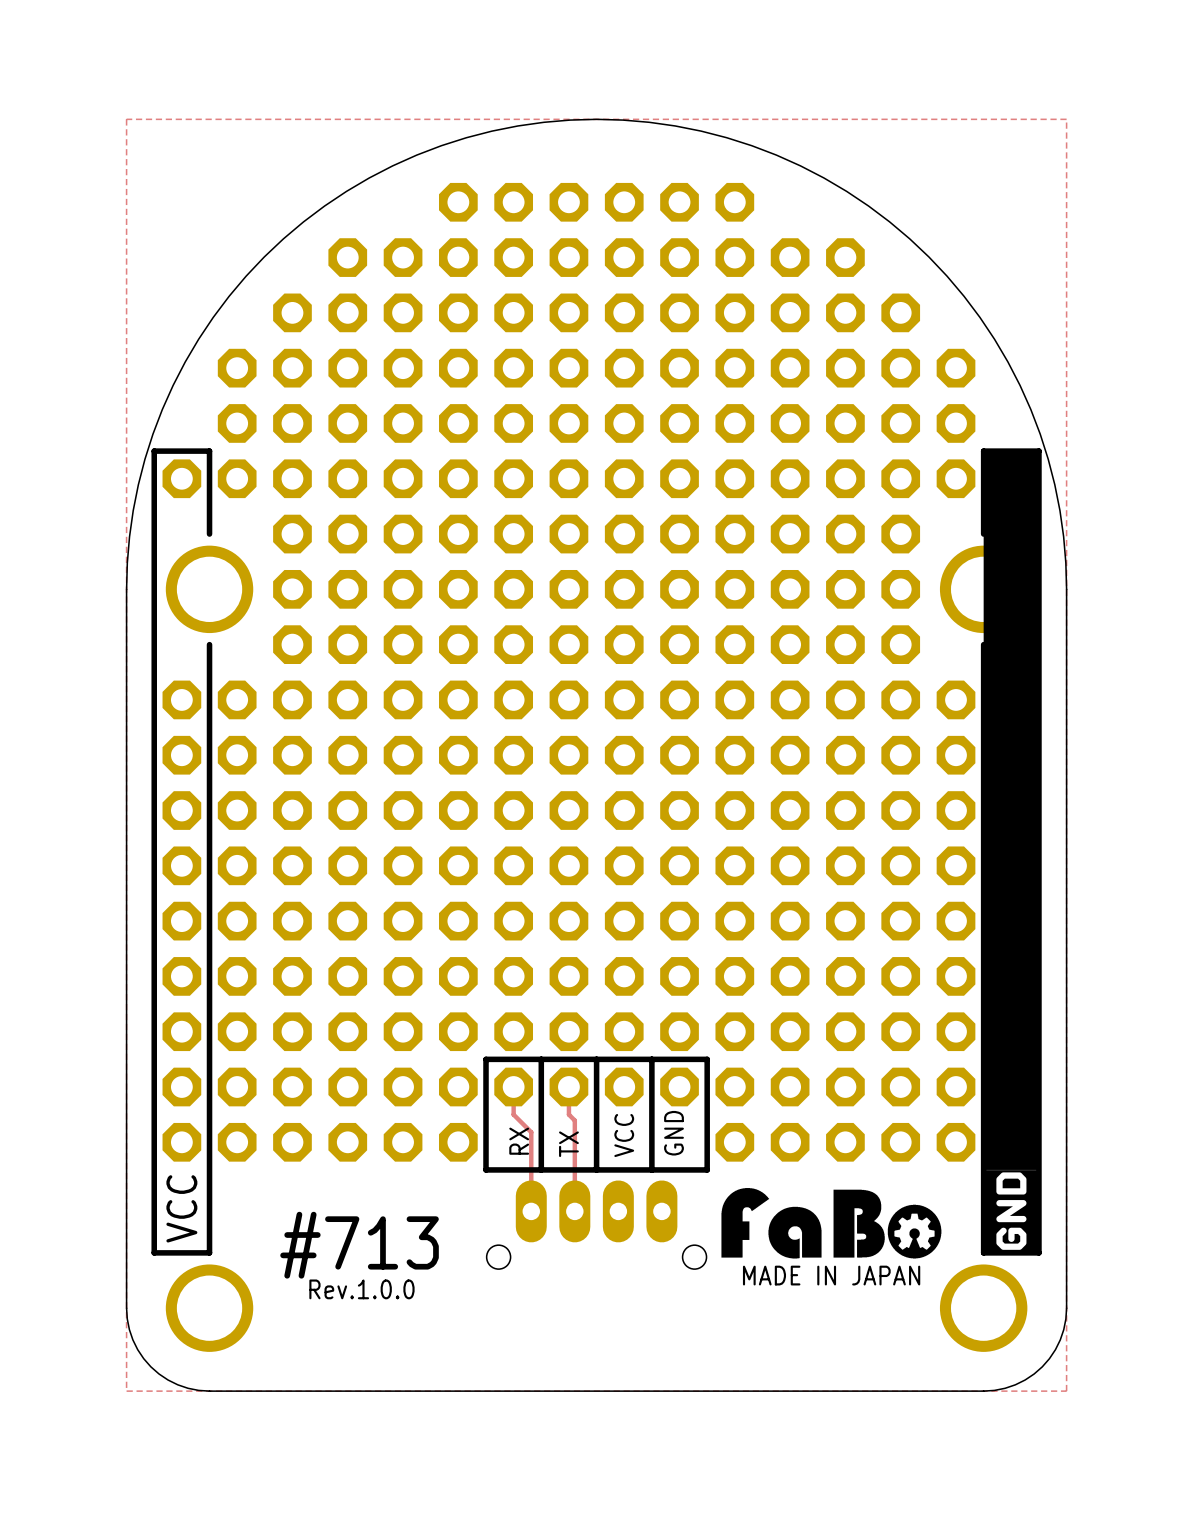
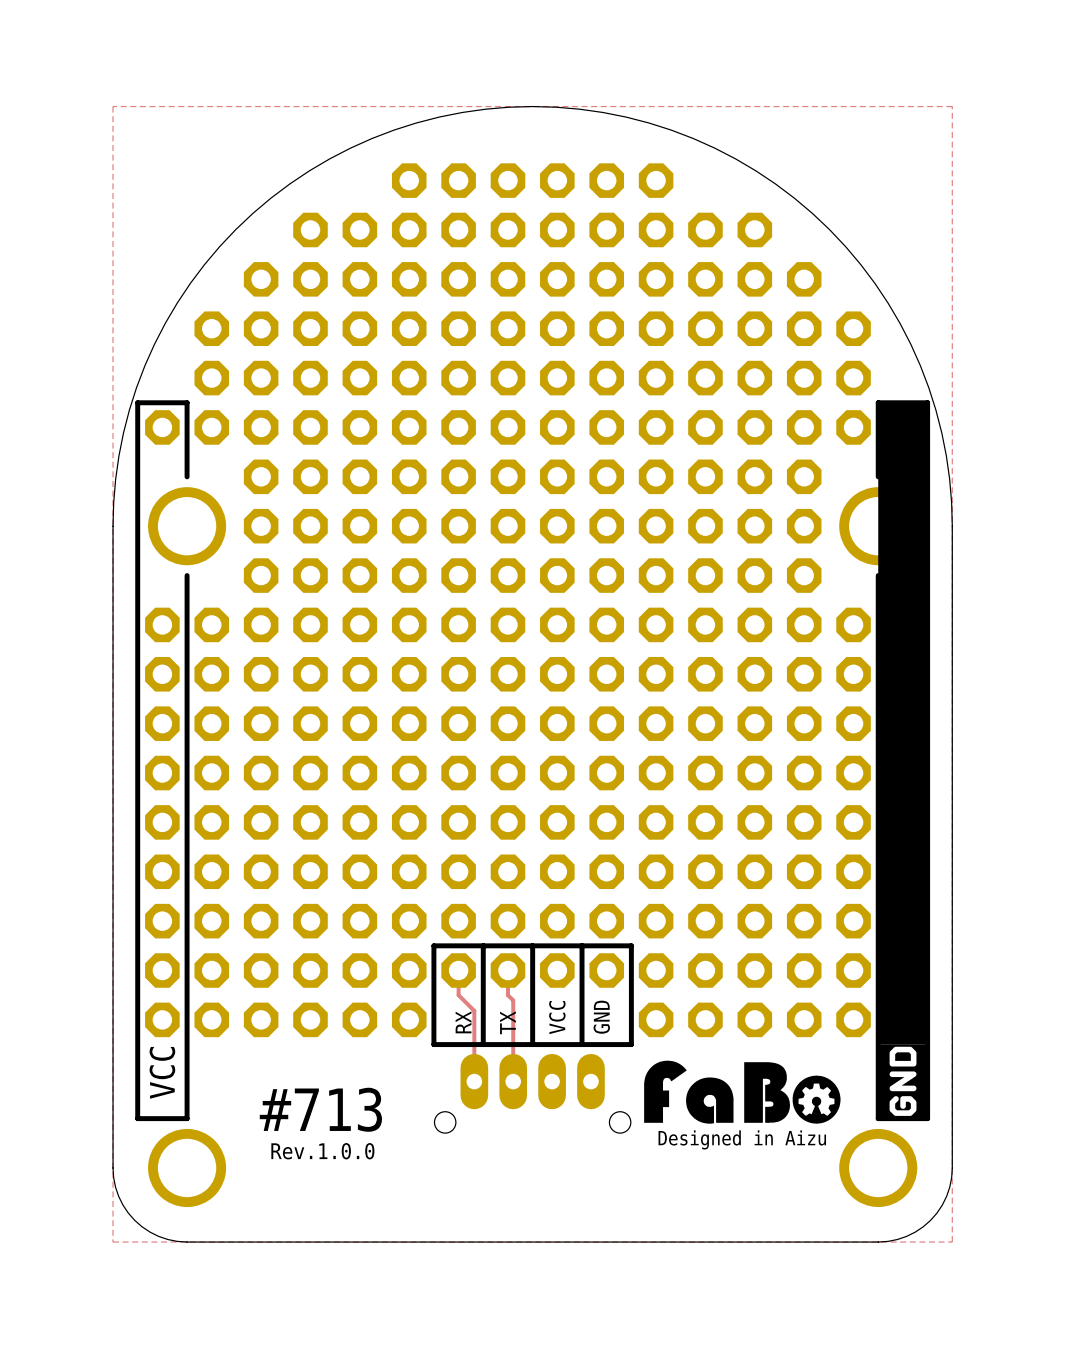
text: MADE IN JAPAN (831, 1275) -> Designed in Aizu (742, 1139)

